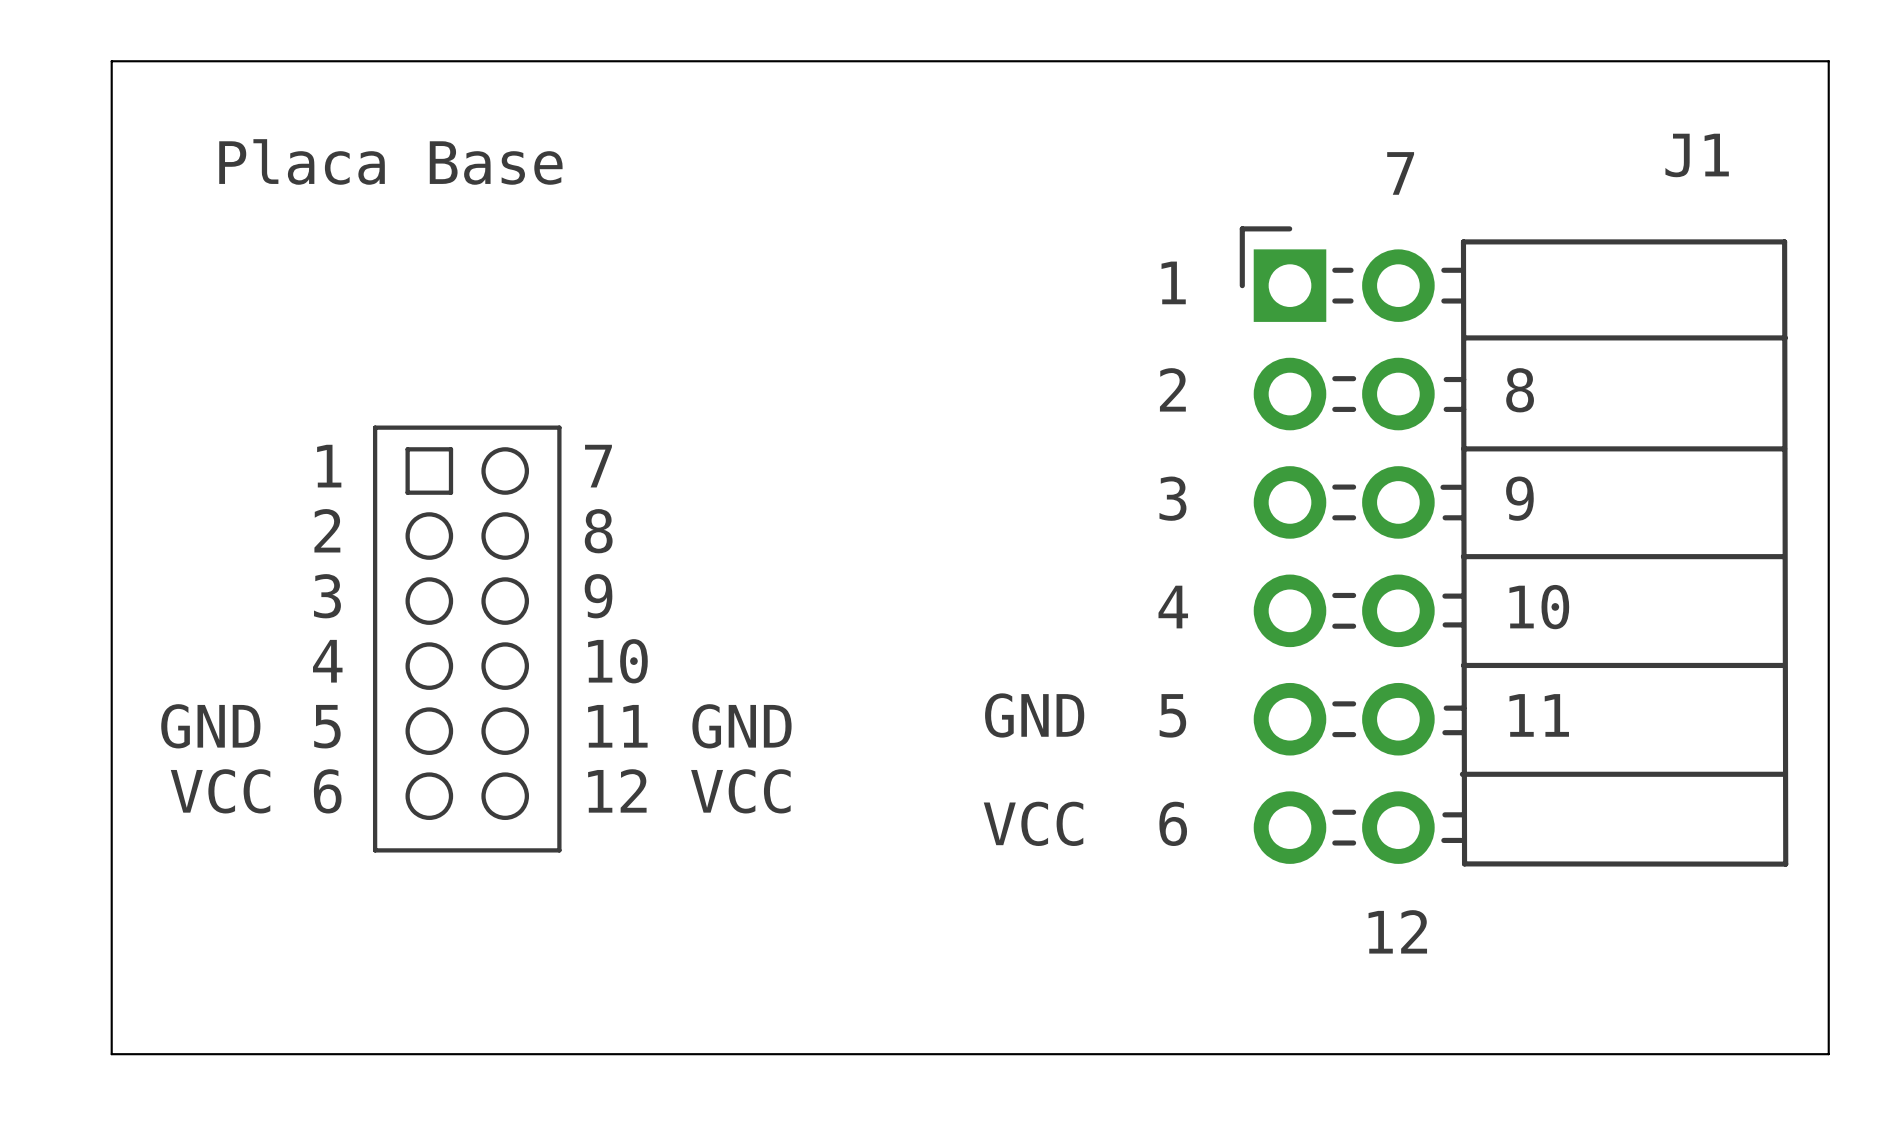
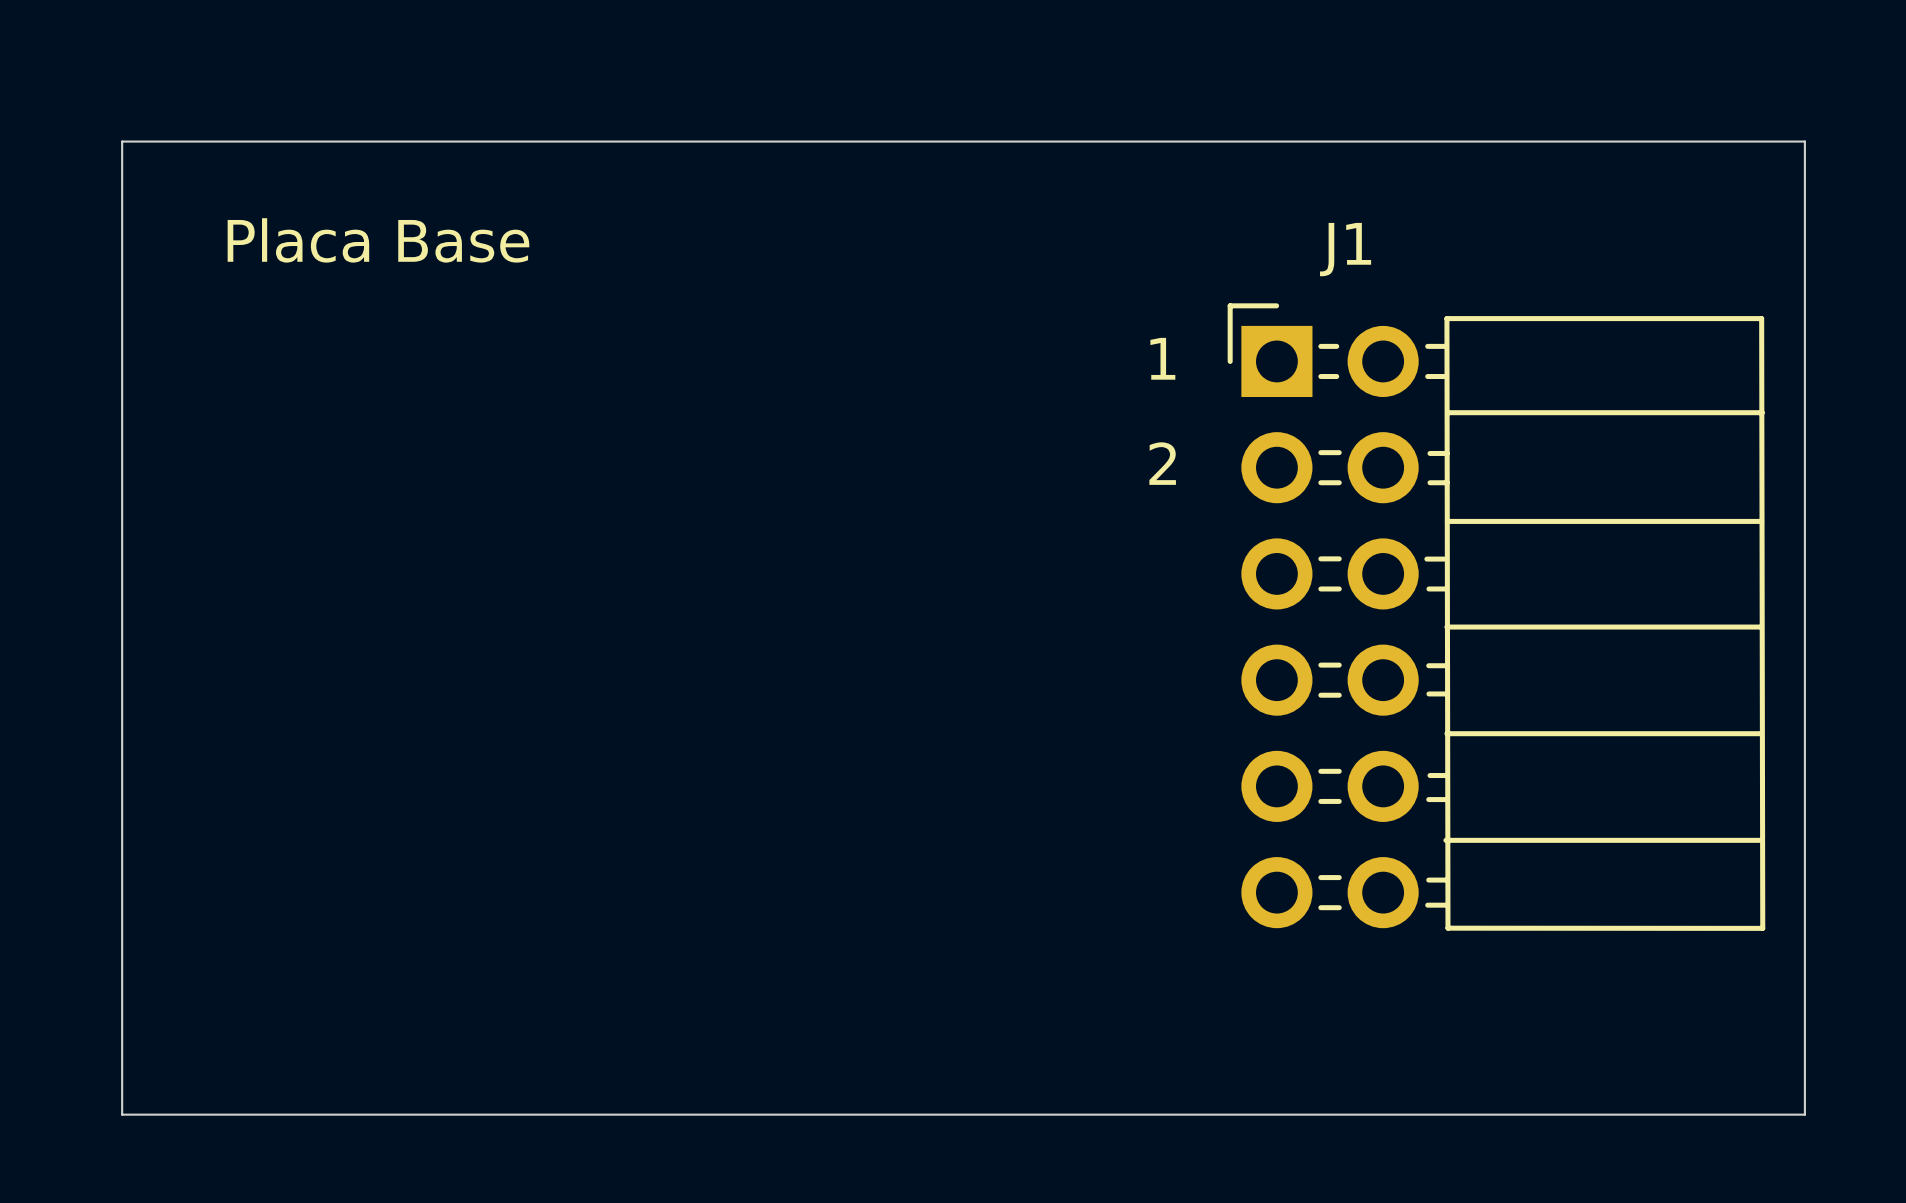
J1 name position: J1 (1697, 155) -> J1 (1345, 249)
text: 7 (1400, 173) -> none
text: 8 (1520, 390) -> none
line: (375, 427) (559, 427) (559, 850) (375, 850) (375, 427) -> none
drawing: [405, 447, 530, 821] -> none
line: (407, 449) (451, 449) (451, 492) (407, 492) (407, 449) -> none
text: 1 (329, 466) -> none
text: 7 (598, 466) -> none
text: 3 (1172, 498) -> none
text: 9 (1519, 498) -> none
text: 2 (327, 530) -> none
text: 8 (598, 531) -> none
text: 3 (327, 596) -> none
text: 9 (598, 596) -> none
text: 4 (1173, 607) -> none
text: 10 (1539, 607) -> none
text: 4 (327, 661) -> none
text: 10 (617, 661) -> none
text: GND (1034, 715) -> none
text: 5 (1172, 715) -> none
text: 11 (1539, 715) -> none
text: GND (210, 726) -> none
text: 5 (327, 726) -> none
text: 11 (617, 726) -> none
text: GND (741, 726) -> none
text: 12 (617, 790) -> none
text: VCC (220, 791) -> none
text: 6 (327, 791) -> none
text: VCC (740, 791) -> none
text: VCC (1033, 823) -> none
text: 6 (1173, 823) -> none
text: 12 (1397, 931) -> none

